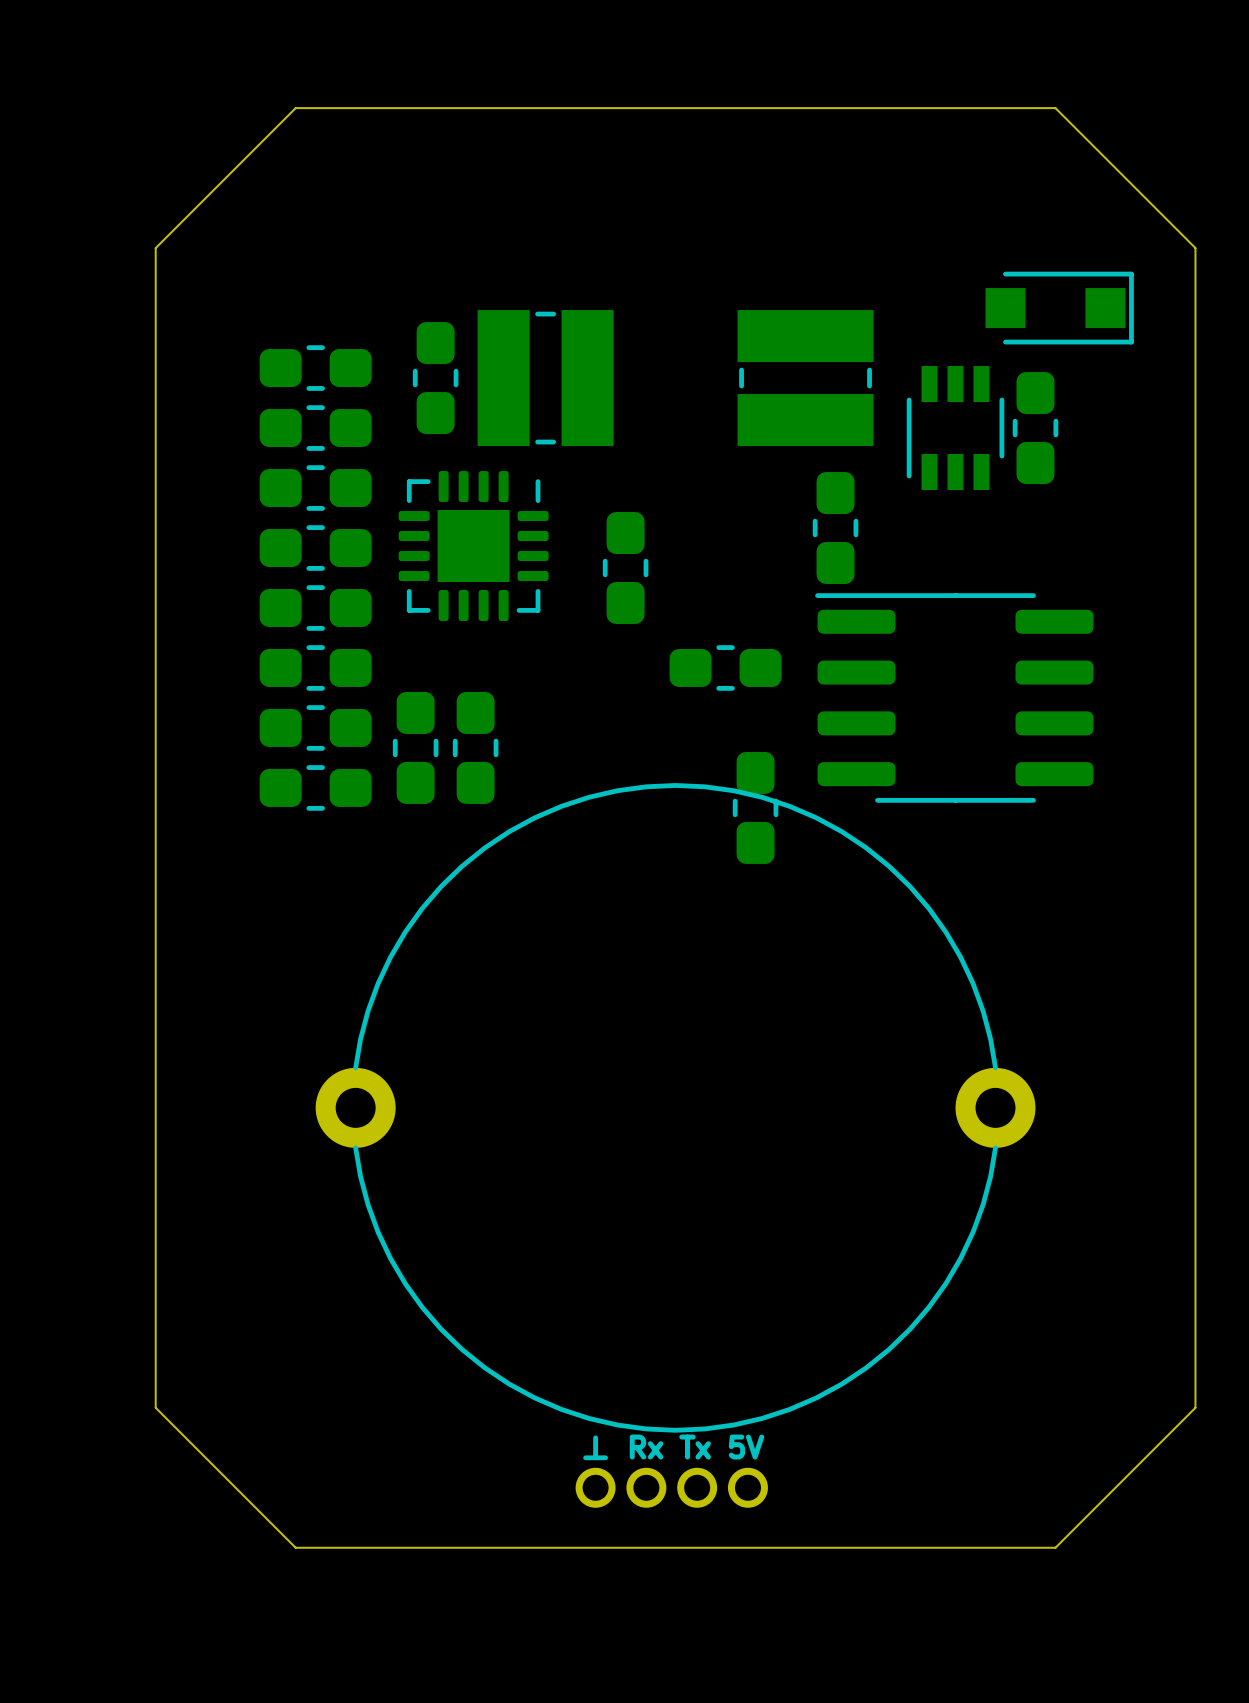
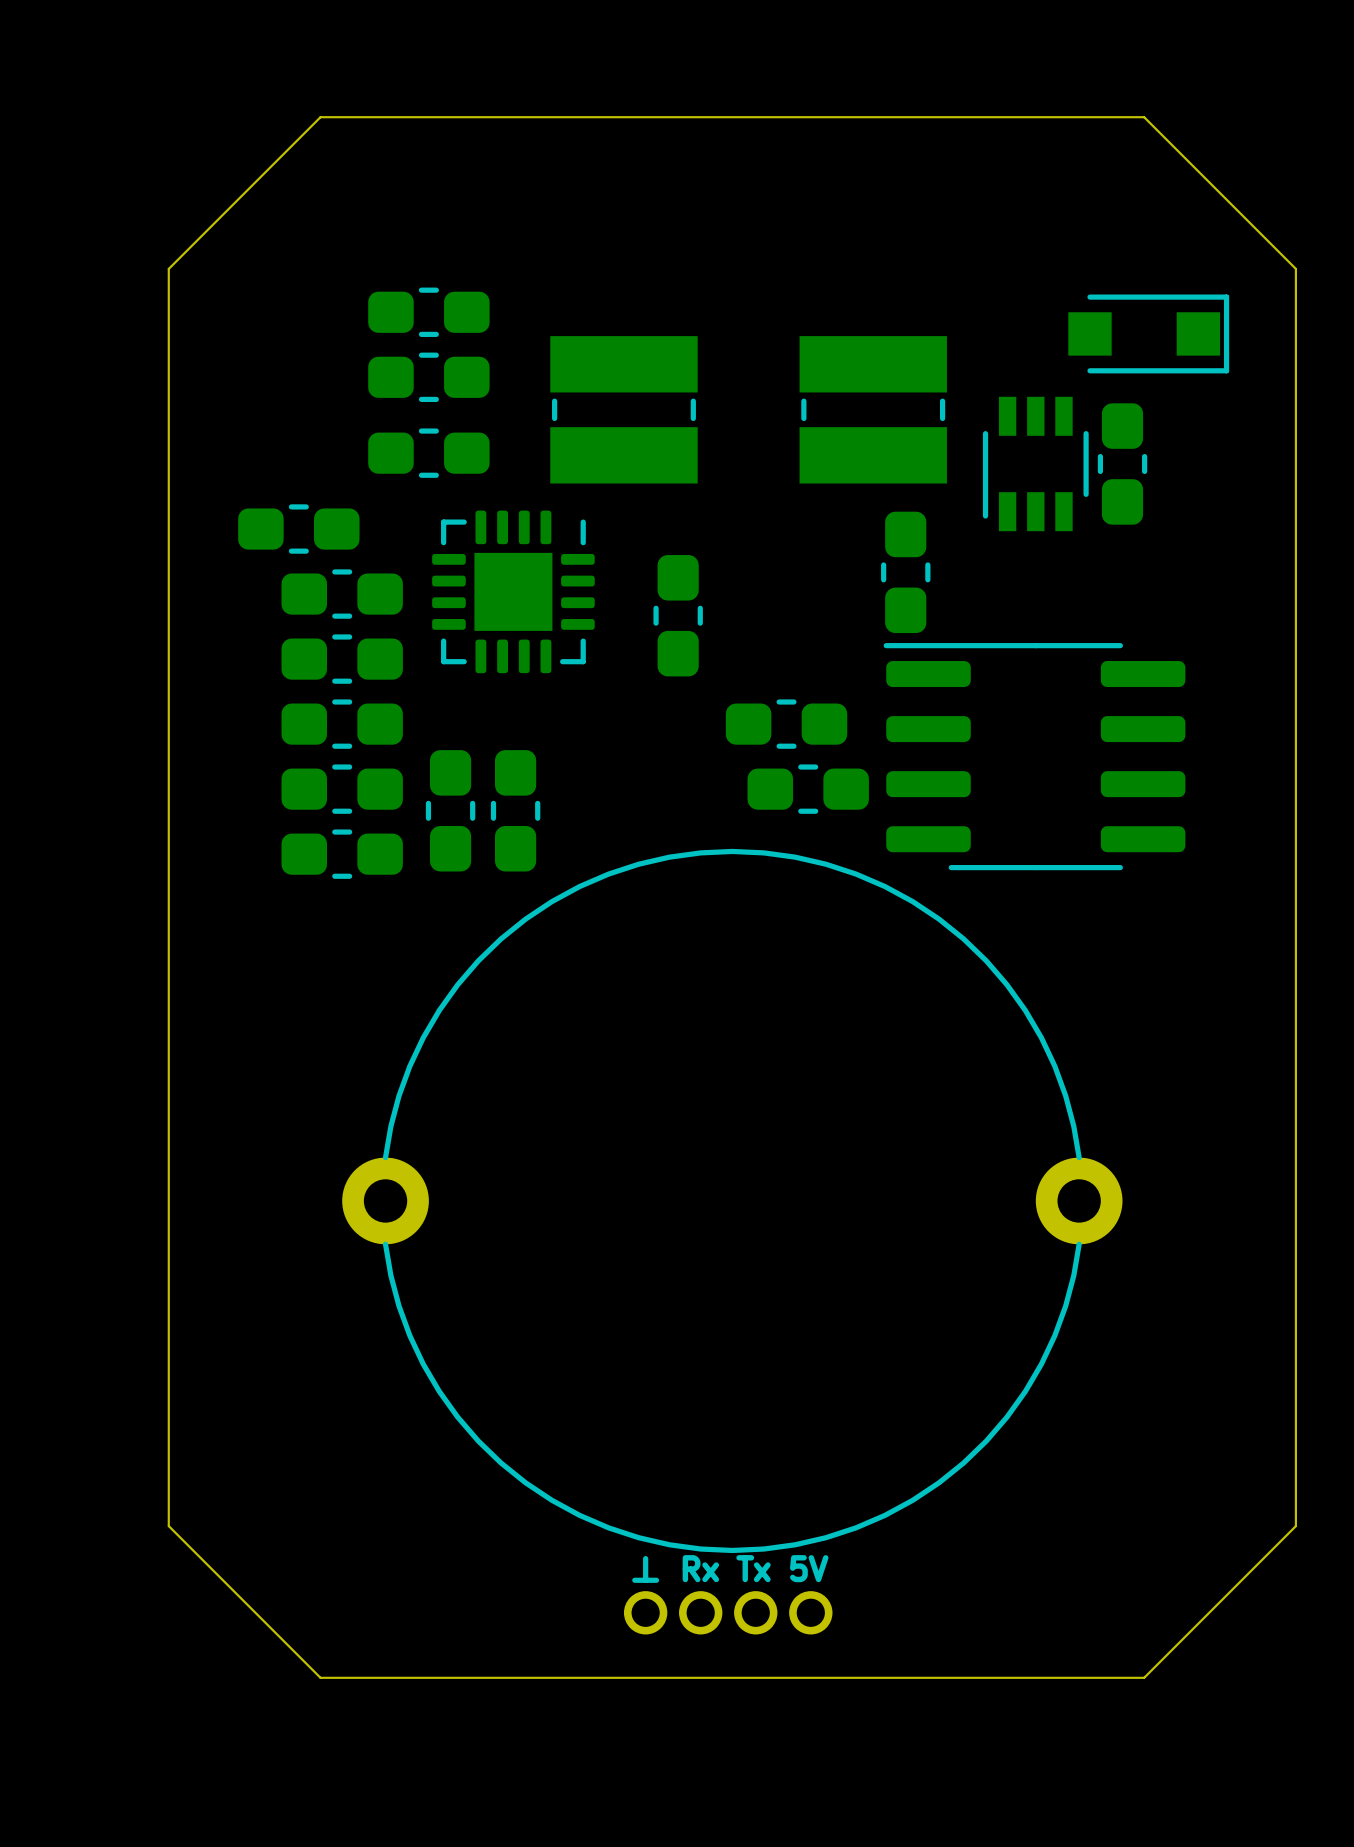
part: none -> (428, 312)
part: none -> (428, 377)
part: (315, 368) -> none
part: (435, 378) -> none
part rotation: 0° (545, 378) -> 90° clockwise (623, 409)
part: none -> (428, 453)
part: (315, 428) -> none
part: none -> (298, 529)
part: (315, 488) -> none
part rotation: 0° (755, 807) -> 90° clockwise (808, 789)
part position: (755, 807) -> (808, 789)

